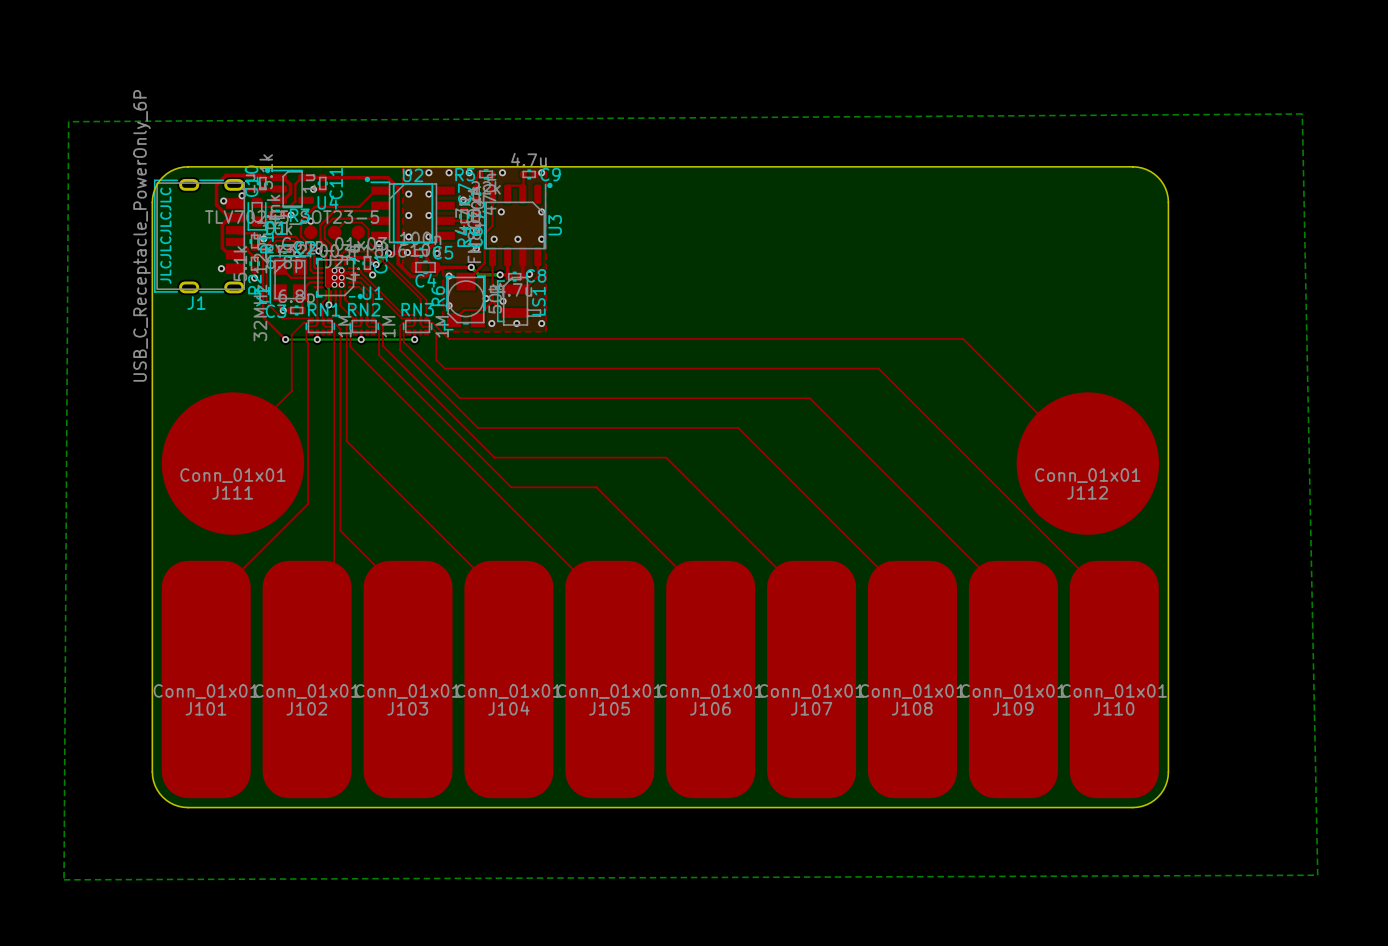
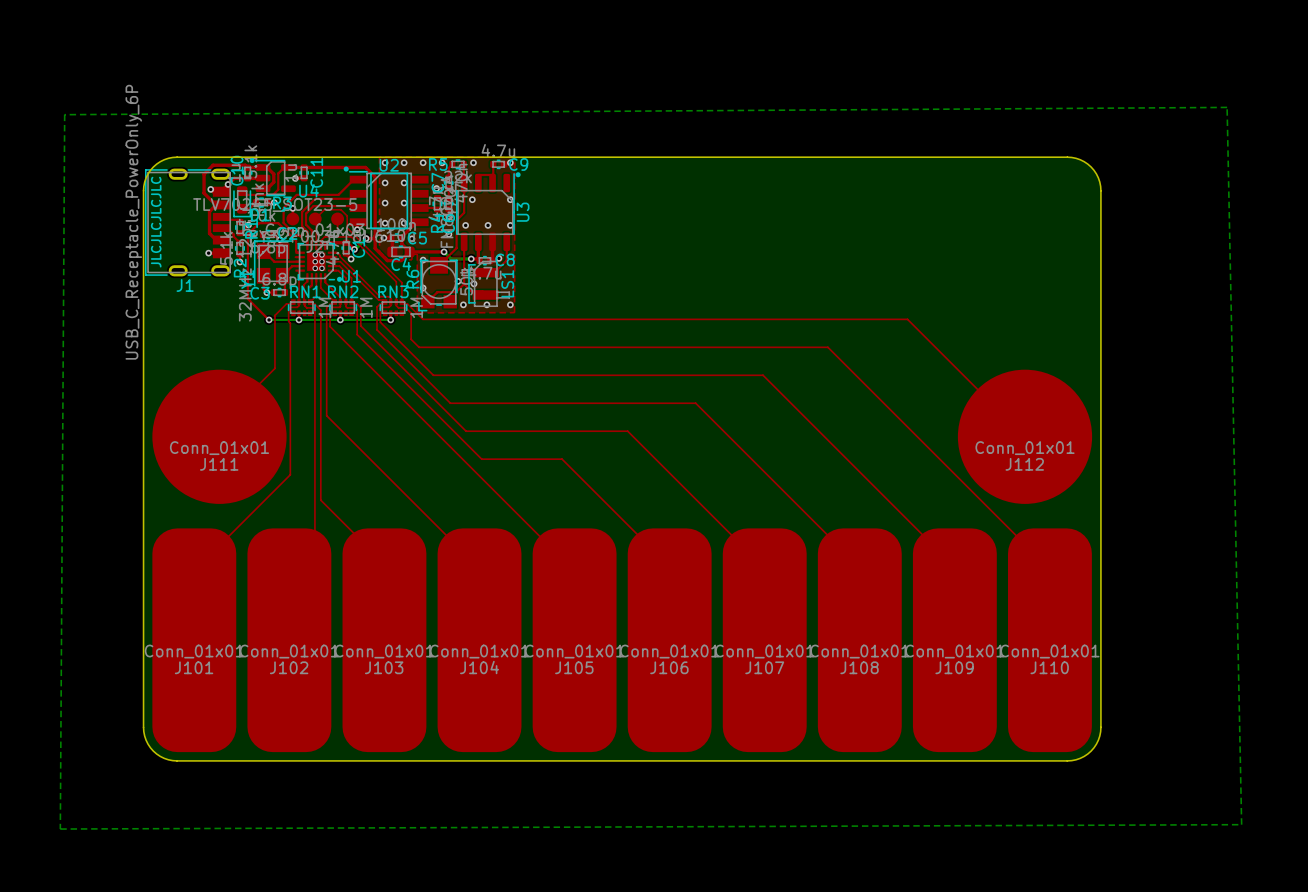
bottom track: (318, 251) (325, 258) (325, 285) (328, 288) (328, 304) -> none
via: (318, 251) -> none
top track: (313, 272) (310, 269) (310, 257) (293, 240) (276, 240) (266, 250) (266, 303) (282, 318) (309, 318) -> none
via: (328, 304) -> none

